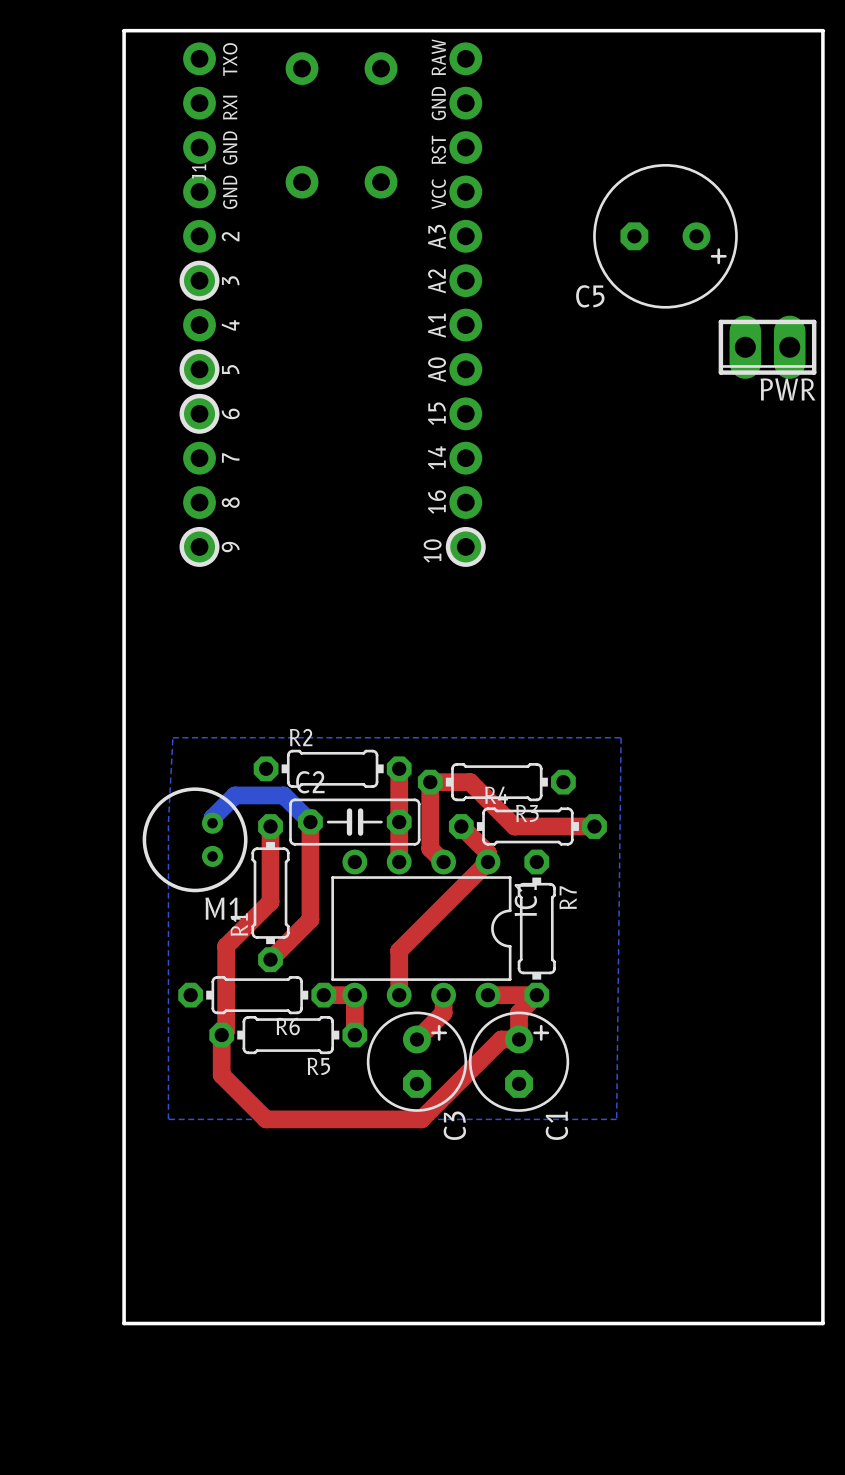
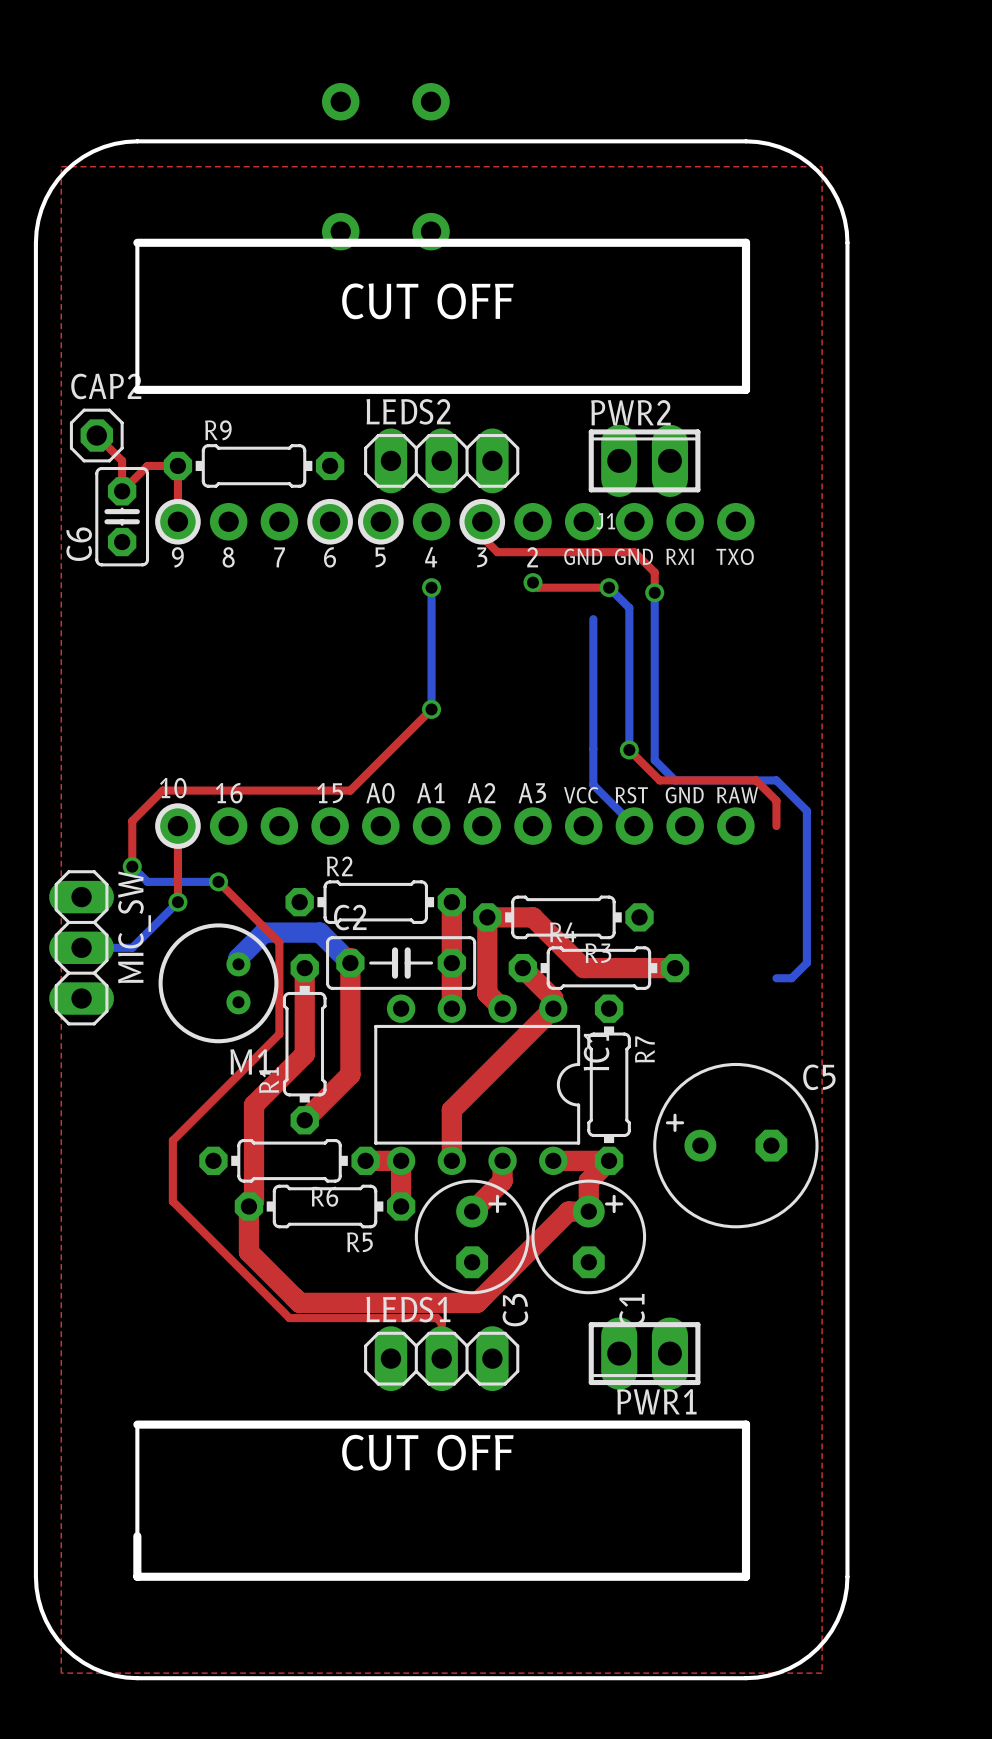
text: RAW (438, 57) -> none
text: TXO (230, 59) -> none
board edge: none -> (137, 141) (757, 141) (779, 147) (799, 156) (817, 171) (837, 198) (844, 220) (847, 242) (847, 1576) (844, 1599) (831, 1630) (817, 1648) (790, 1668) (768, 1675) (746, 1678) (126, 1677) (103, 1672) (83, 1662) (65, 1648) (45, 1620) (38, 1599) (35, 1576) (36, 231) (45, 198) (65, 171) (93, 151) (114, 143) (137, 141)
text: GND (438, 103) -> none
text: RXI (230, 107) -> none
top zone outline: none -> (61, 166) (61, 1673) (822, 1673) (822, 166) (61, 166)
text: GND (230, 147) -> none
text: RST (438, 149) -> none
text rotation: 0° (199, 172) -> 90° clockwise (605, 521)
text position: J1 (199, 172) -> J1 (605, 521)
board edge: (124, 191) (124, 30) (822, 30) (822, 1323) (124, 1323) -> (137, 242) (746, 242) (746, 389) (137, 389)
text: GND (230, 192) -> none
text: VCC (438, 194) -> none
text rotation: 0° (230, 236) -> 90° clockwise (532, 557)
text position: 2 (230, 236) -> 2 (532, 557)
text rotation: 0° (436, 236) -> 90° clockwise (532, 793)
text position: A3 (436, 236) -> A3 (532, 793)
C5 rotation: 0° (665, 236) -> 180° (735, 1145)
C5 position: (665, 236) -> (735, 1145)
text: none -> CUT OFF (427, 301)
drawing: [179, 260, 220, 301] -> none
text rotation: 0° (230, 280) -> 90° clockwise (482, 557)
text position: 3 (230, 280) -> 3 (482, 557)
text rotation: 0° (436, 281) -> 90° clockwise (481, 793)
text position: A2 (436, 281) -> A2 (481, 793)
part: (199, 302) -> none
part: (465, 302) -> none
board edge: (124, 320) (124, 1225) -> (137, 1536) (137, 1576) (746, 1576) (746, 1424) (137, 1424)
text rotation: 0° (230, 325) -> 90° clockwise (431, 557)
text position: 4 (230, 325) -> 4 (431, 557)
text rotation: 0° (436, 325) -> 90° clockwise (430, 793)
text position: A1 (436, 325) -> A1 (430, 793)
PWR: (767, 347) -> none
drawing: [179, 349, 220, 434] -> none
top track: none -> (96, 435) (122, 460) (122, 491) (147, 465) (177, 465) (177, 521)
CAP2: none -> (96, 435)
text rotation: 0° (230, 369) -> 90° clockwise (380, 557)
text position: 5 (230, 369) -> 5 (380, 557)
text rotation: 0° (437, 369) -> 90° clockwise (380, 793)
text position: A0 (437, 369) -> A0 (380, 793)
LEDS2: none -> (441, 460)
PWR2: none -> (644, 460)
R9: none -> (254, 465)
text rotation: 0° (230, 413) -> 90° clockwise (330, 557)
text position: 6 (230, 413) -> 6 (330, 557)
text rotation: 0° (436, 413) -> 90° clockwise (330, 793)
text position: 15 (436, 413) -> 15 (330, 793)
drawing: none -> [155, 498, 201, 545]
drawing: none -> [307, 498, 404, 545]
drawing: none -> [459, 498, 506, 545]
C6: none -> (122, 516)
part: none -> (456, 521)
top track: none -> (482, 521) (482, 536) (497, 552) (634, 552) (654, 572) (654, 592)
text: 14 (436, 457) -> none
text rotation: 0° (230, 458) -> 90° clockwise (279, 557)
text: none -> GND (583, 556)
text: none -> GND (633, 556)
text: none -> RXI (680, 556)
text: none -> TXO (735, 556)
top track: none -> (532, 582) (538, 587) (609, 587)
via: none -> (532, 582)
bottom track: none -> (431, 587) (431, 709)
via: none -> (431, 587)
bottom track: none -> (609, 587) (629, 607) (629, 750)
via: none -> (609, 587)
bottom track: none -> (654, 592) (654, 760) (675, 780) (776, 780) (806, 810) (806, 963) (791, 978) (776, 978)
via: none -> (654, 592)
text rotation: 0° (230, 502) -> 90° clockwise (228, 557)
text position: 8 (230, 502) -> 8 (228, 557)
text rotation: 0° (437, 502) -> 90° clockwise (229, 793)
text position: 16 (437, 502) -> 16 (229, 793)
bottom track: none -> (593, 619) (593, 785) (634, 826)
drawing: [179, 526, 220, 567] -> none
drawing: [445, 526, 486, 567] -> none
text rotation: 0° (230, 547) -> 90° clockwise (177, 557)
text position: 9 (230, 547) -> 9 (177, 557)
text rotation: 0° (432, 550) -> 90° clockwise (173, 788)
text position: 10 (432, 550) -> 10 (173, 788)
top track: none -> (431, 709) (350, 790) (162, 790) (132, 821) (132, 866)
via: none -> (431, 709)
top track: none -> (629, 750) (659, 780) (756, 780) (776, 800) (776, 826)
via: none -> (629, 750)
text: none -> VCC (581, 795)
text: none -> RST (631, 795)
text: none -> GND (684, 795)
text: none -> RAW (737, 795)
drawing: none -> [155, 803, 201, 849]
top track: none -> (177, 826) (177, 902)
part: none -> (456, 826)
bottom track: none -> (132, 866) (147, 881) (218, 881)
via: none -> (132, 866)
bottom zone outline: (172, 737) (168, 822) (168, 1119) (616, 1119) (621, 737) (172, 737) -> none
top track: none -> (218, 881) (279, 942) (279, 1034) (172, 1140) (172, 1201) (289, 1318) (436, 1318) (441, 1323) (441, 1358)
via: none -> (218, 881)
bottom track: none -> (177, 902) (132, 947) (81, 947)
via: none -> (177, 902)
MIC_SW: none -> (81, 947)
PWR1: none -> (644, 1353)
LEDS1: none -> (441, 1358)
text: none -> CUT OFF (427, 1452)

